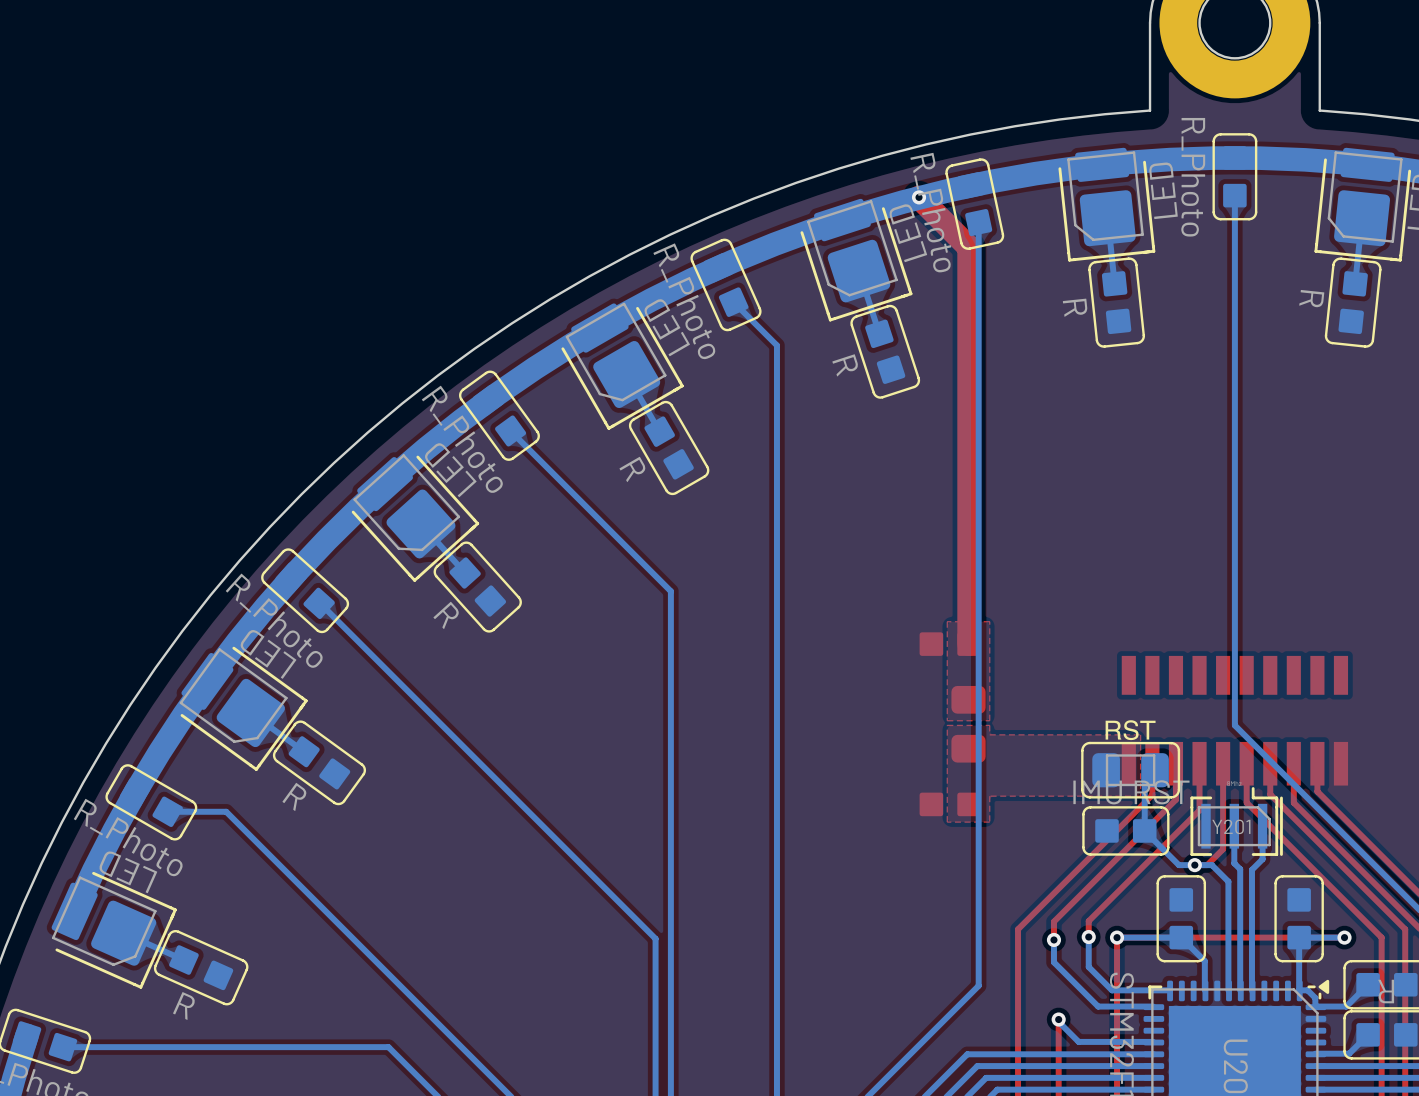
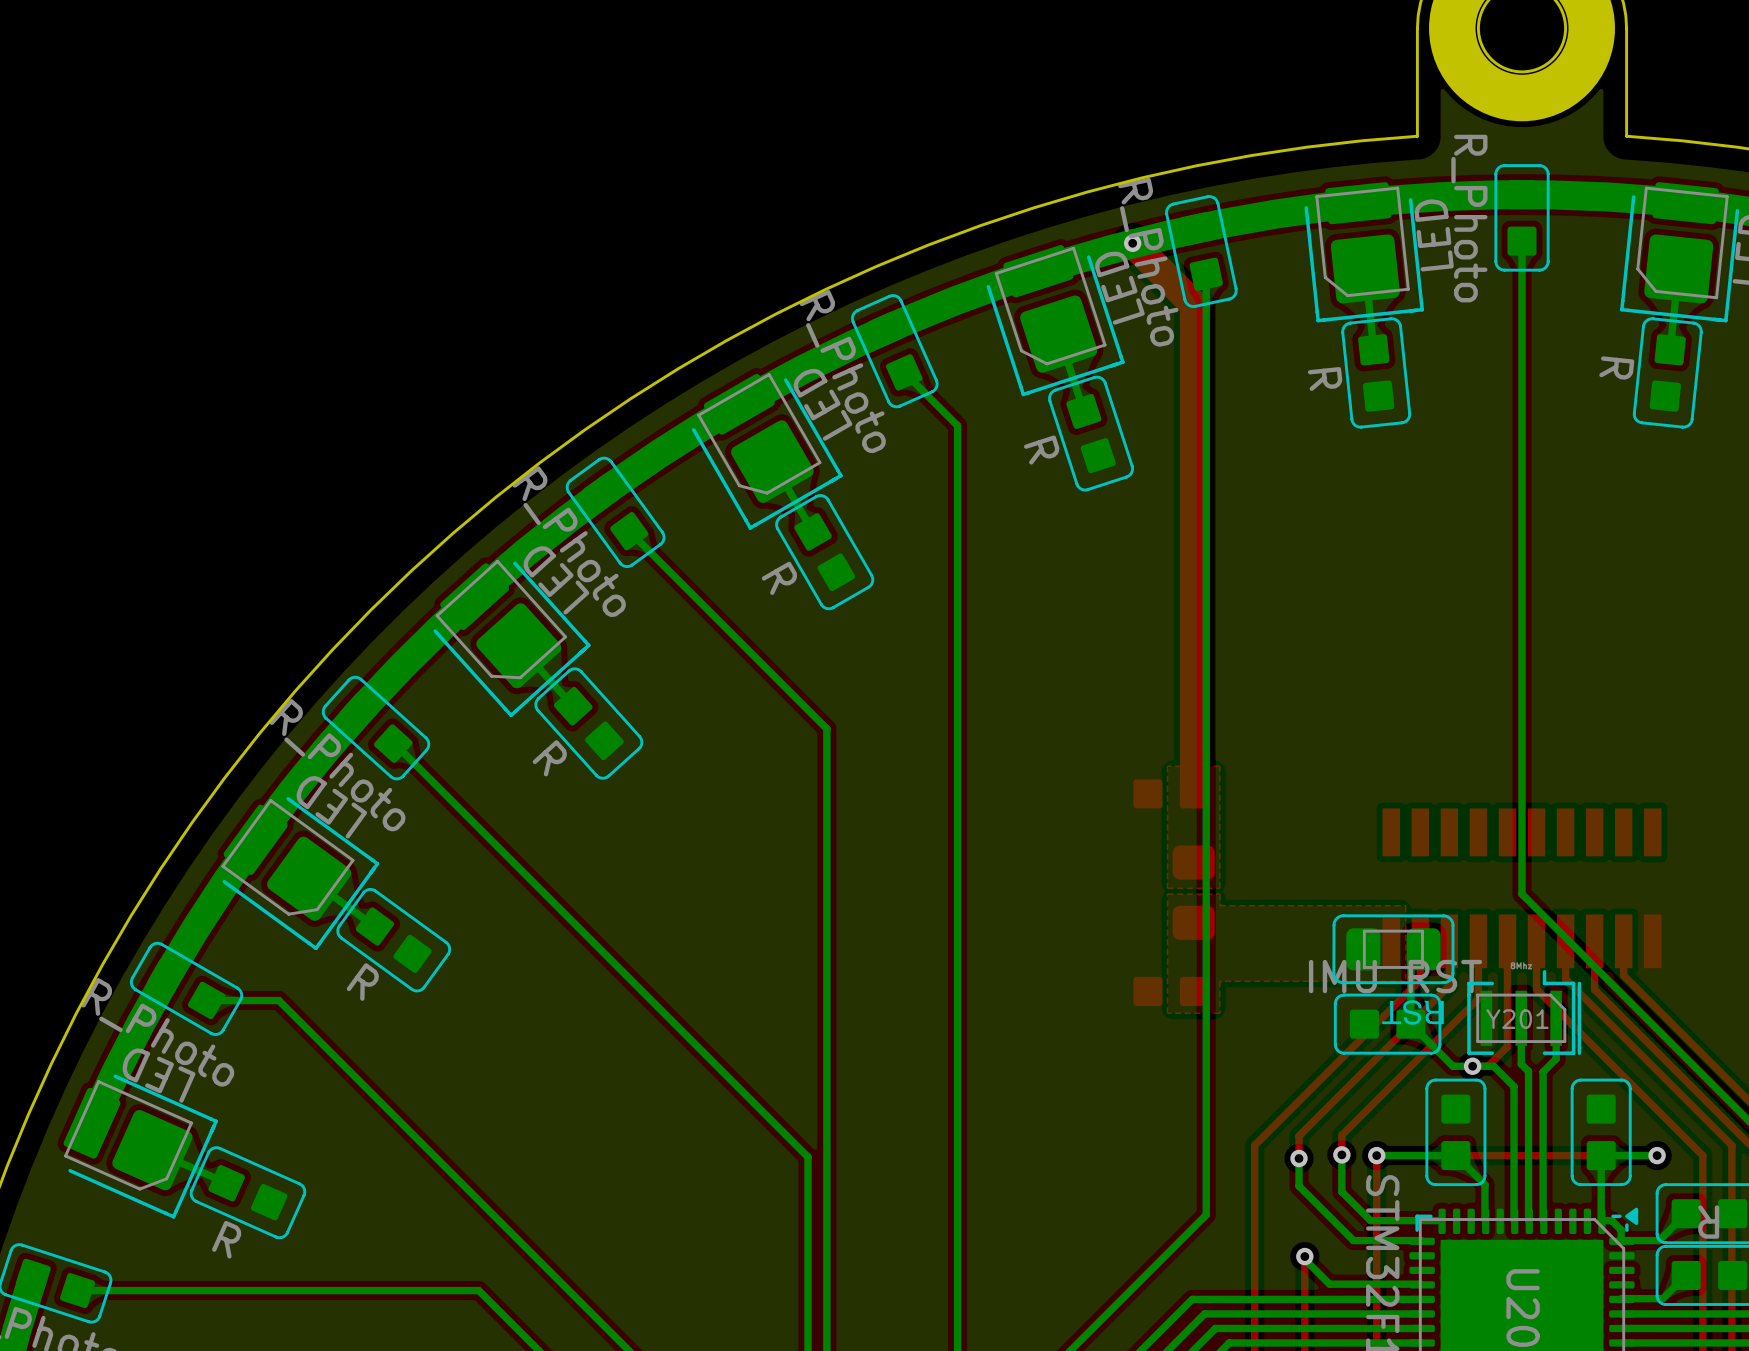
drawing: [1105, 720, 1156, 741] -> none
drawing: none -> [1382, 1000, 1444, 1025]

